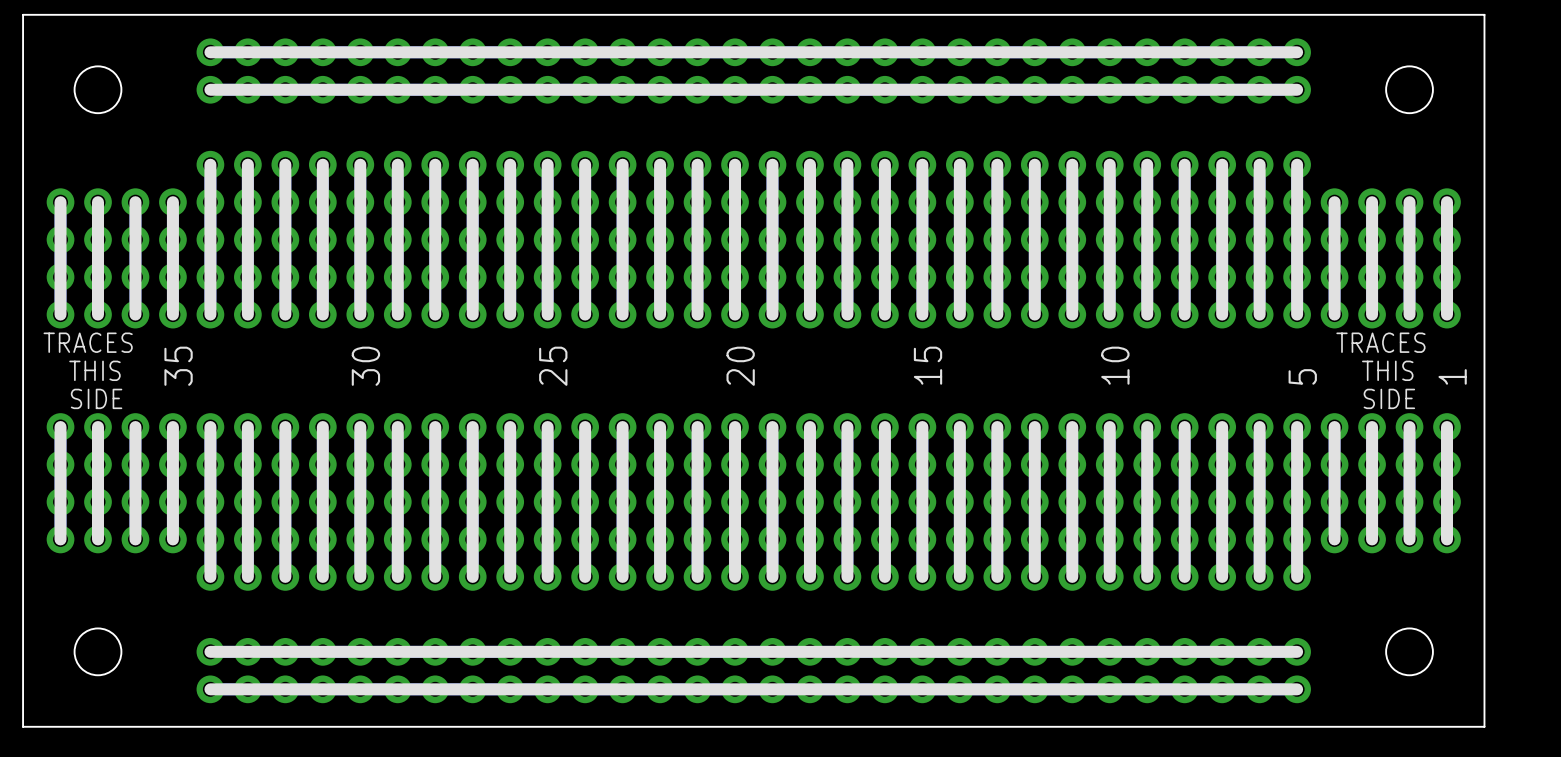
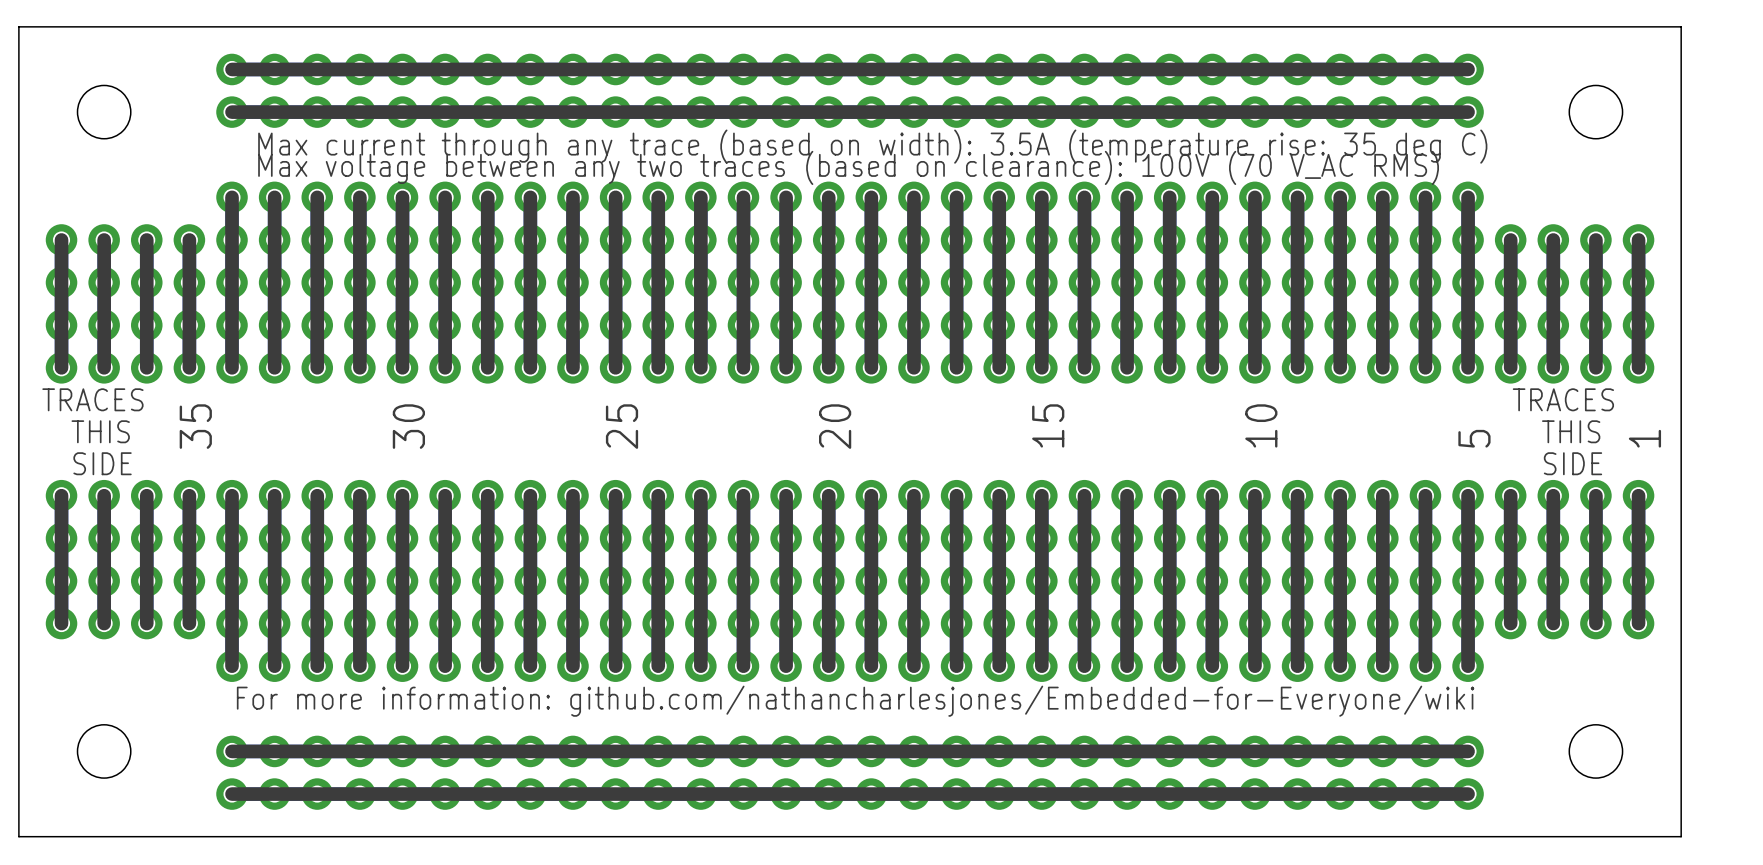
text: none -> Max current through any trace (based on width): 3.5A (temperature rise: 35 deg C) (872, 146)
text: none -> Max voltage between any two traces (based on clearance): 100V (70 V_AC RMS) (848, 167)
text: none -> For more information: github.com/nathancharlesjones/Embedded-for-Everyone/wiki (855, 701)

